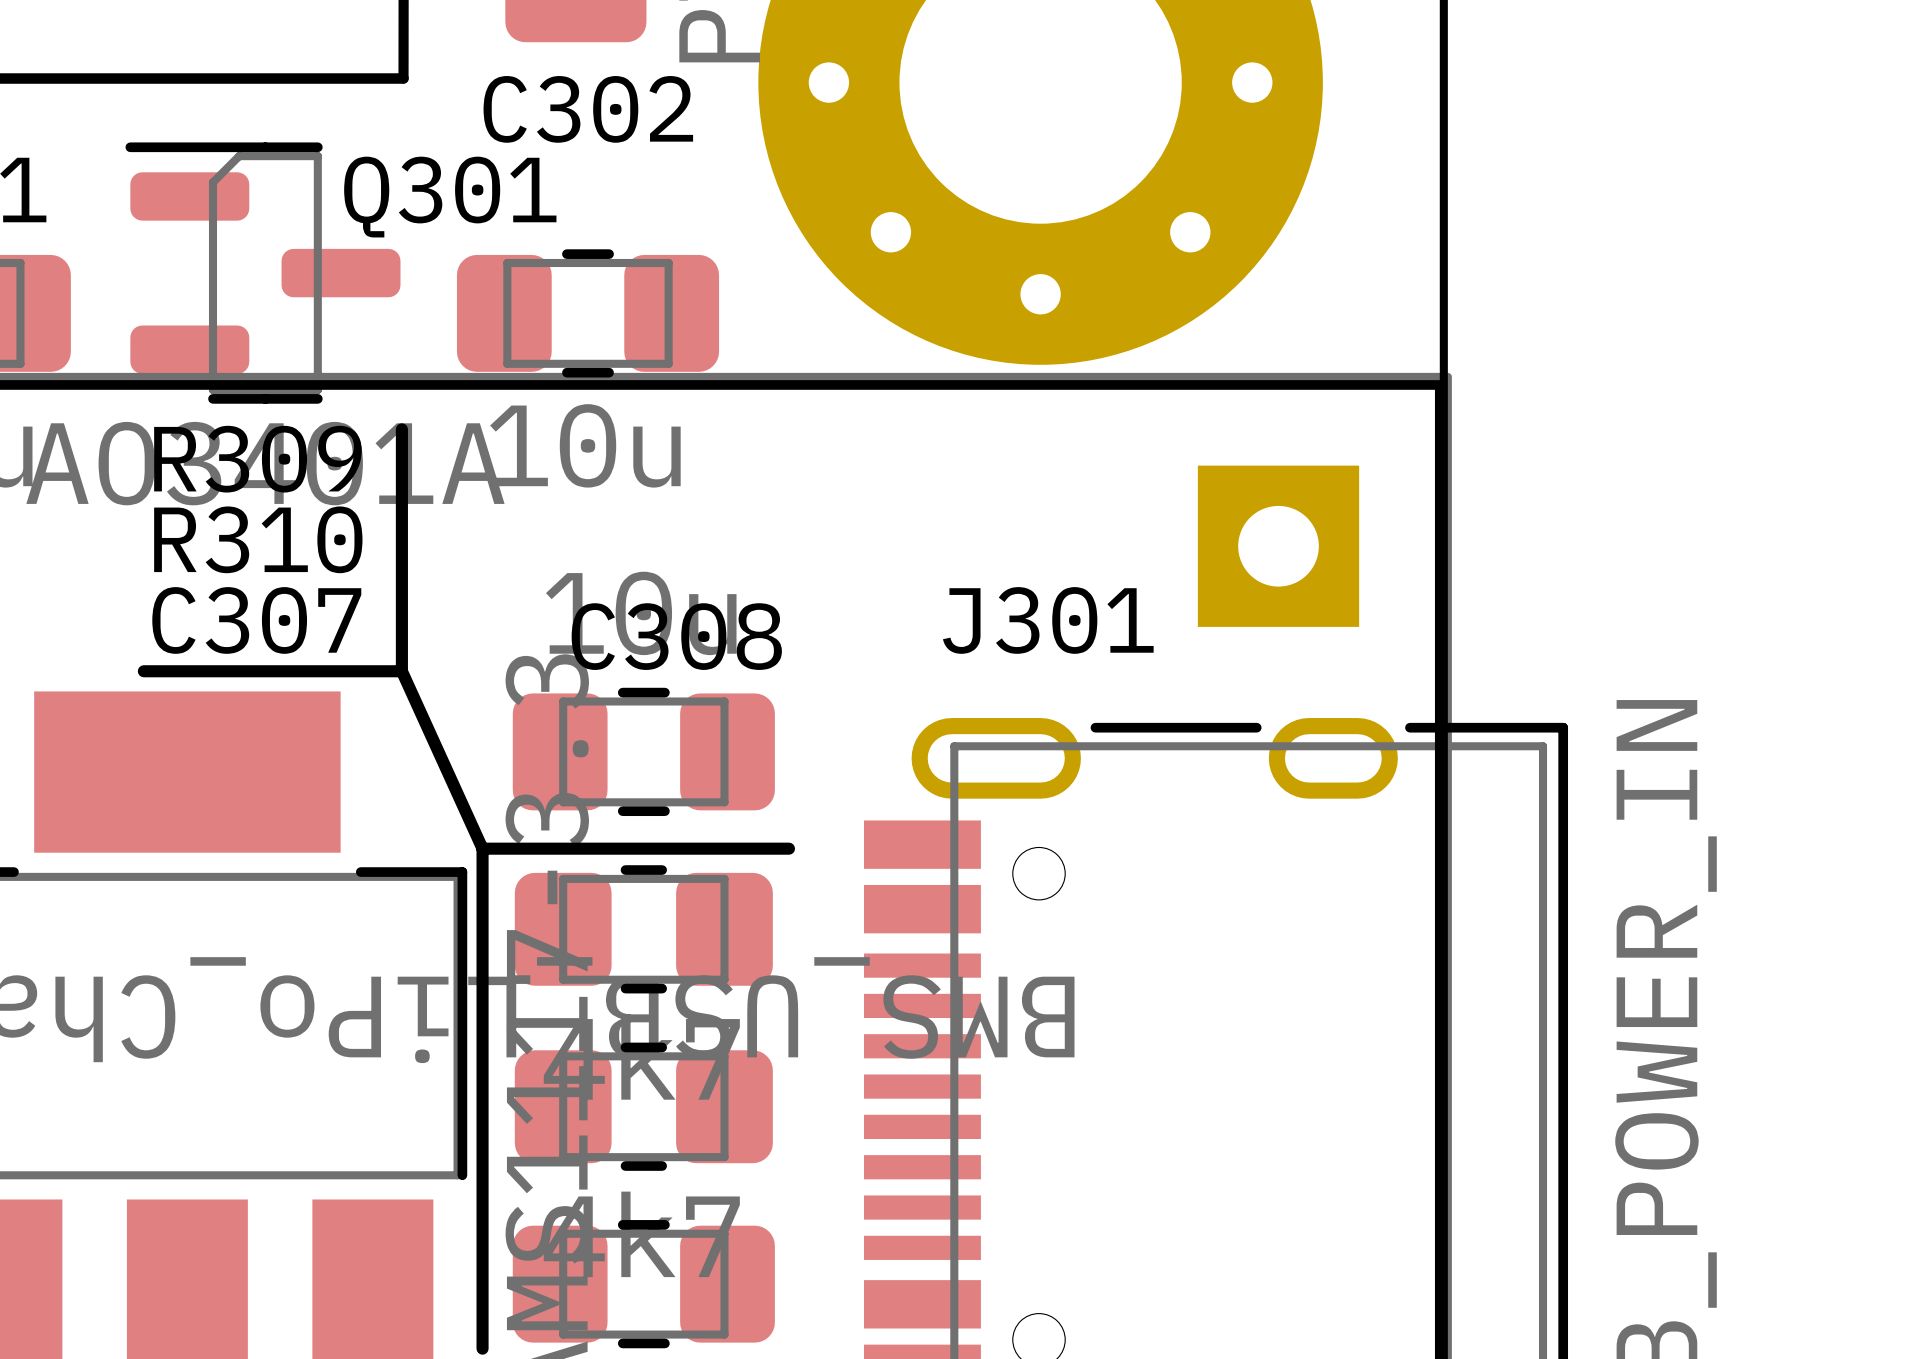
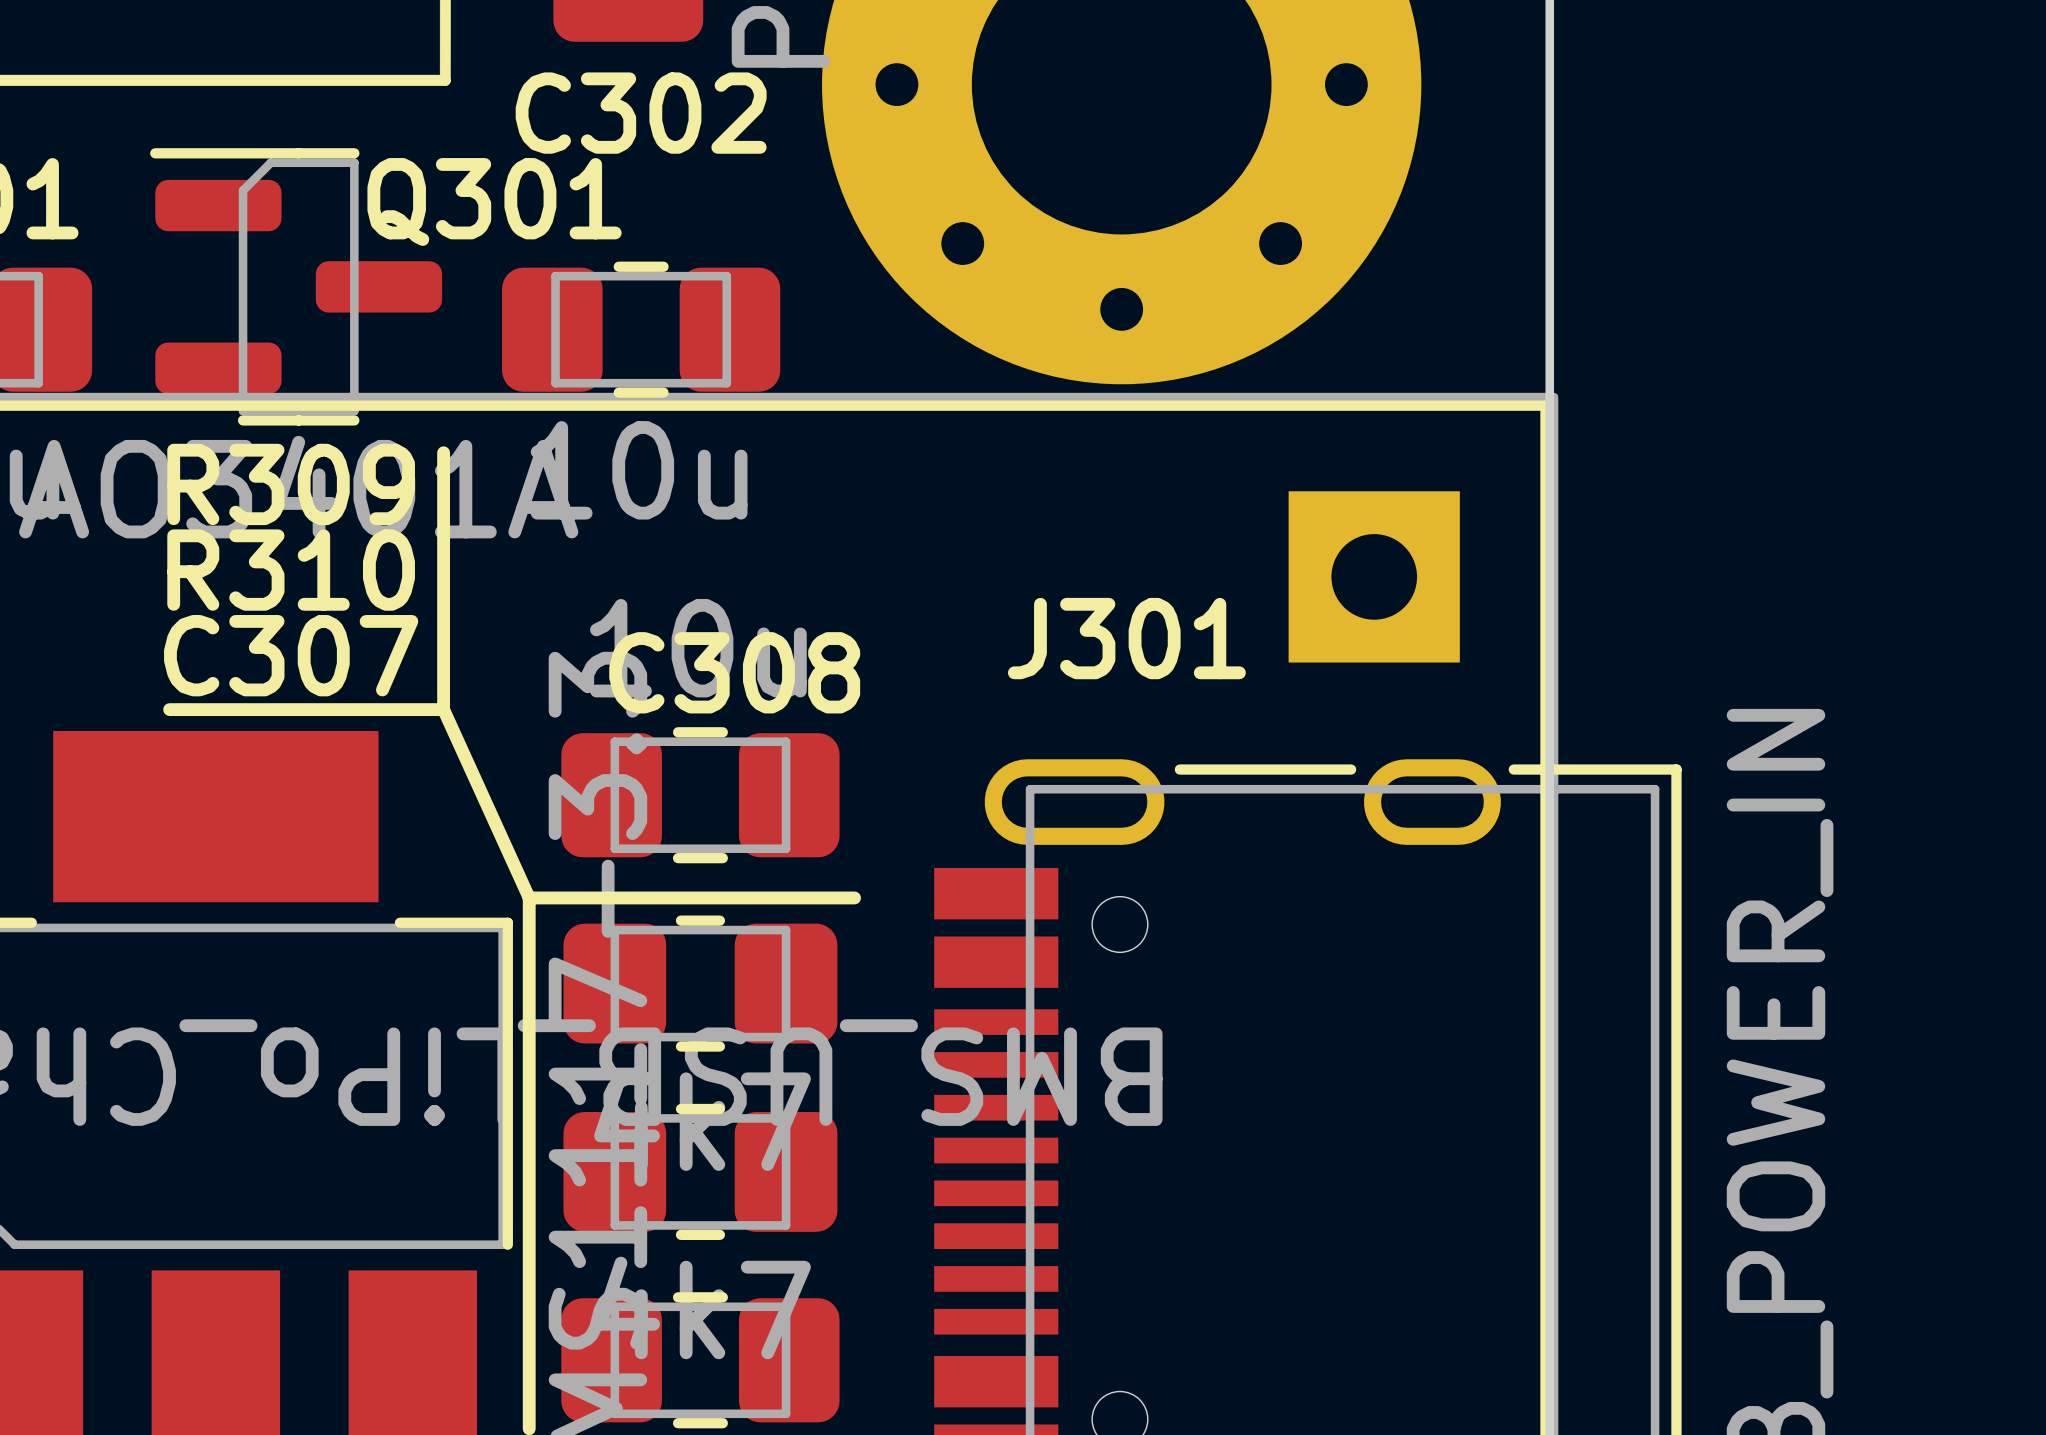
J301 name position: J301 (1048, 620) -> J301 (1126, 638)

